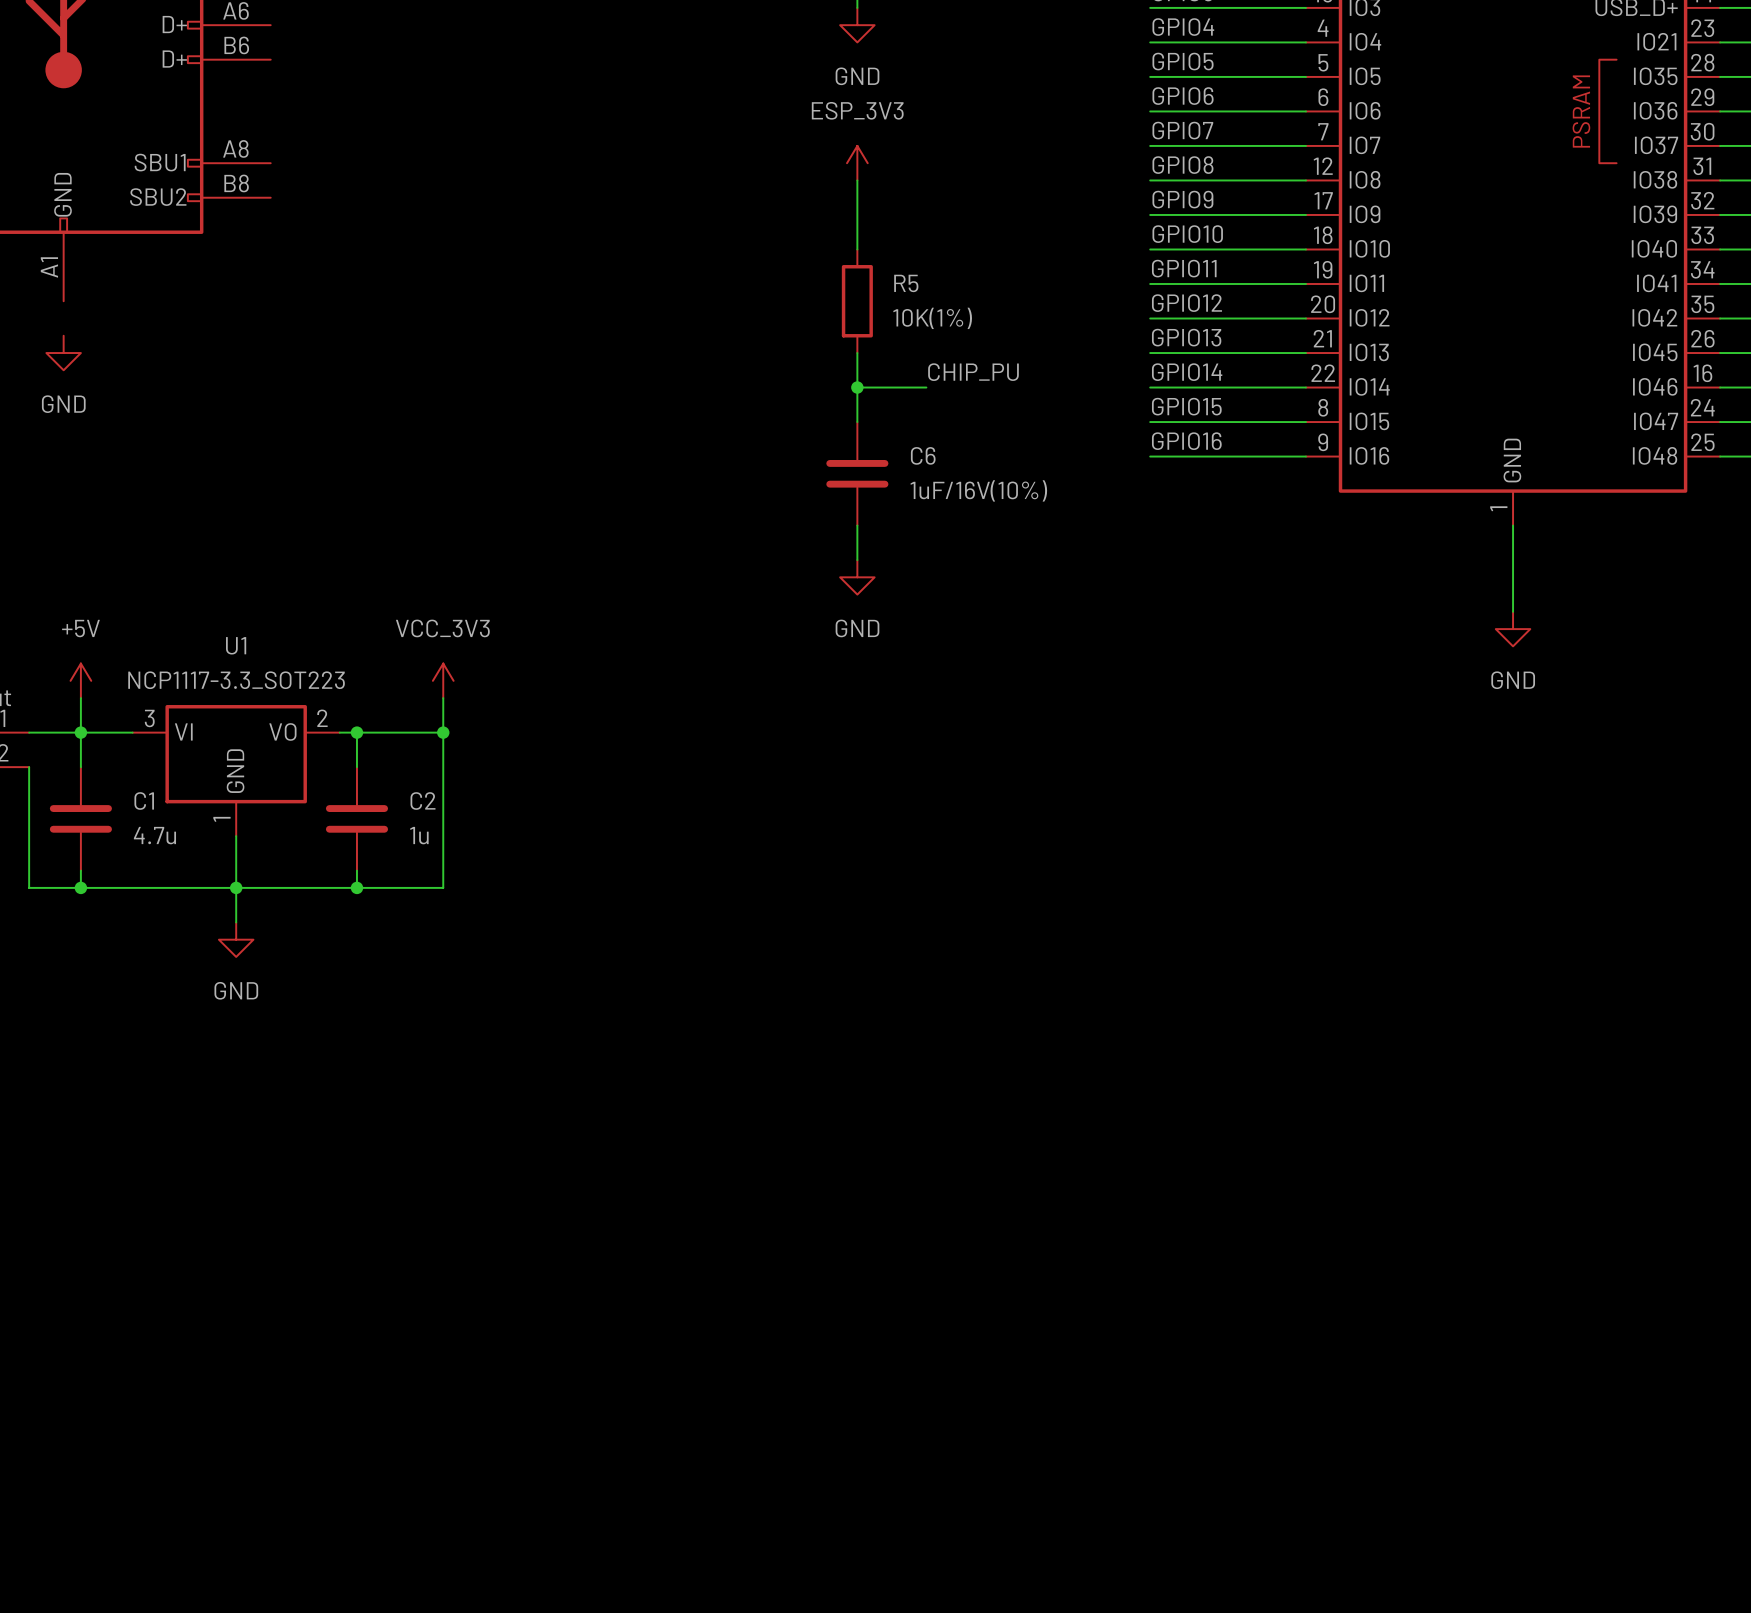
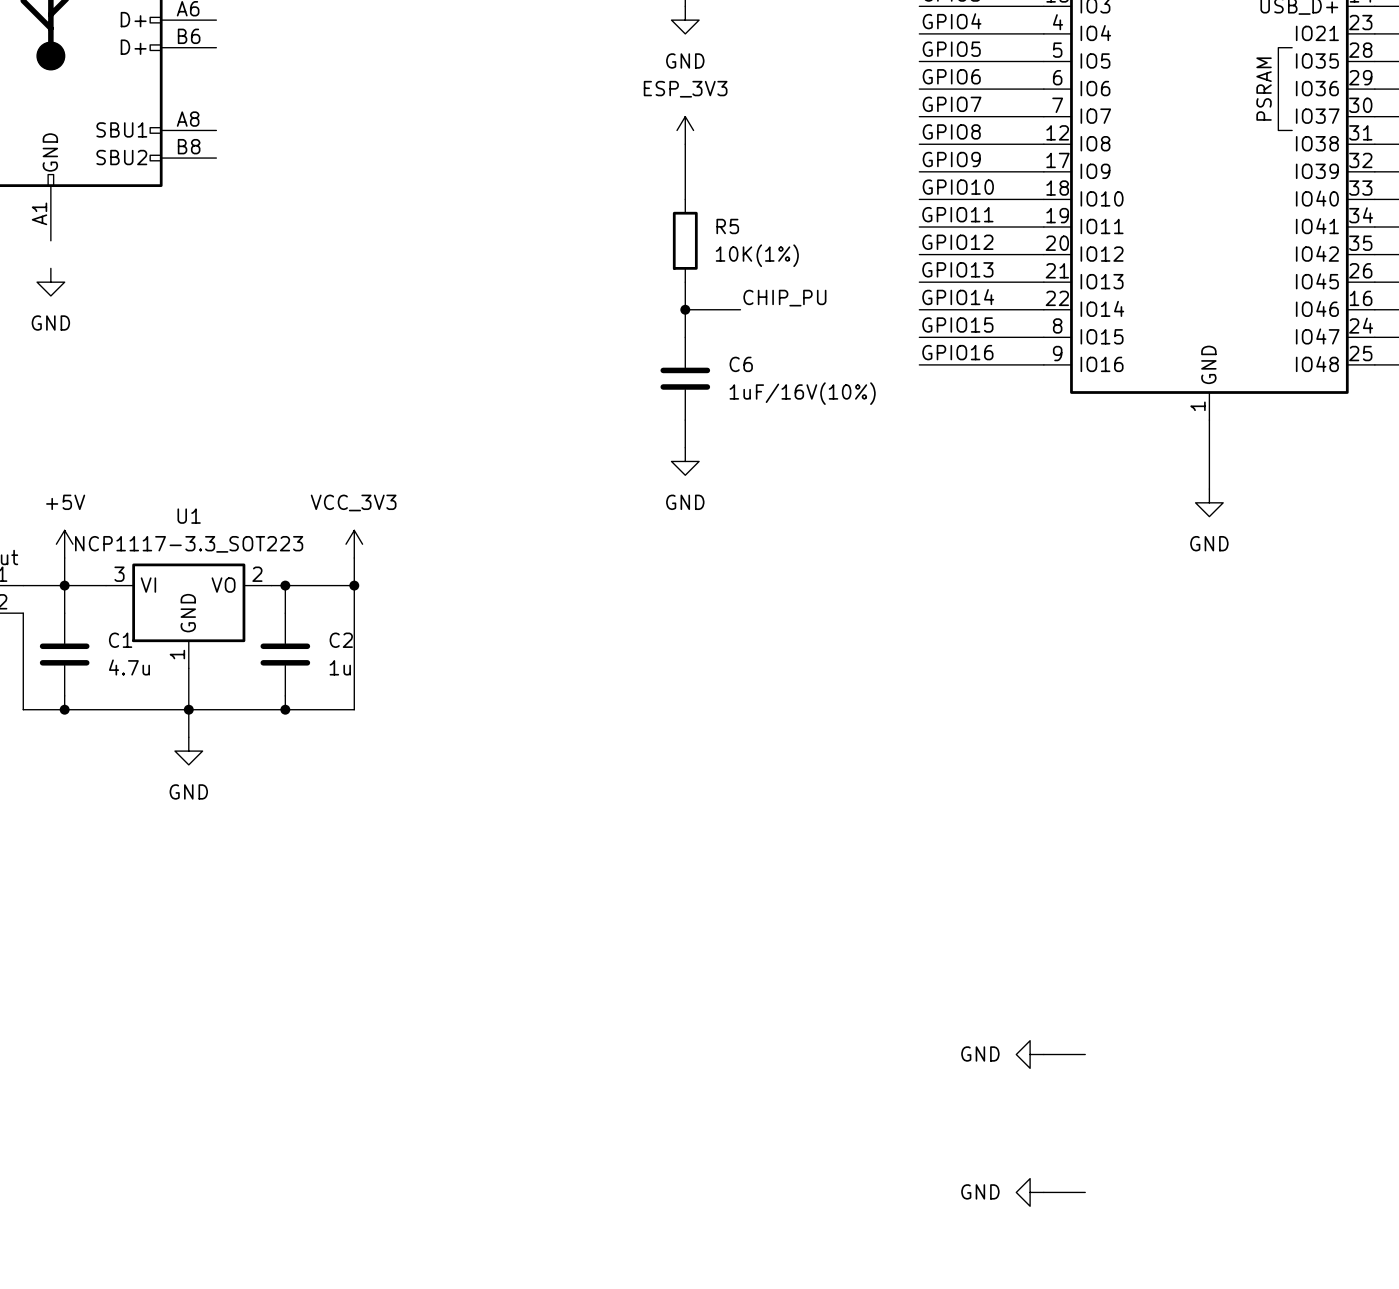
power symbol: none -> GND (1030, 1054)
wire: none -> (1043, 1054) (1085, 1054)
power symbol: none -> GND (1030, 1192)
wire: none -> (1043, 1192) (1085, 1192)

